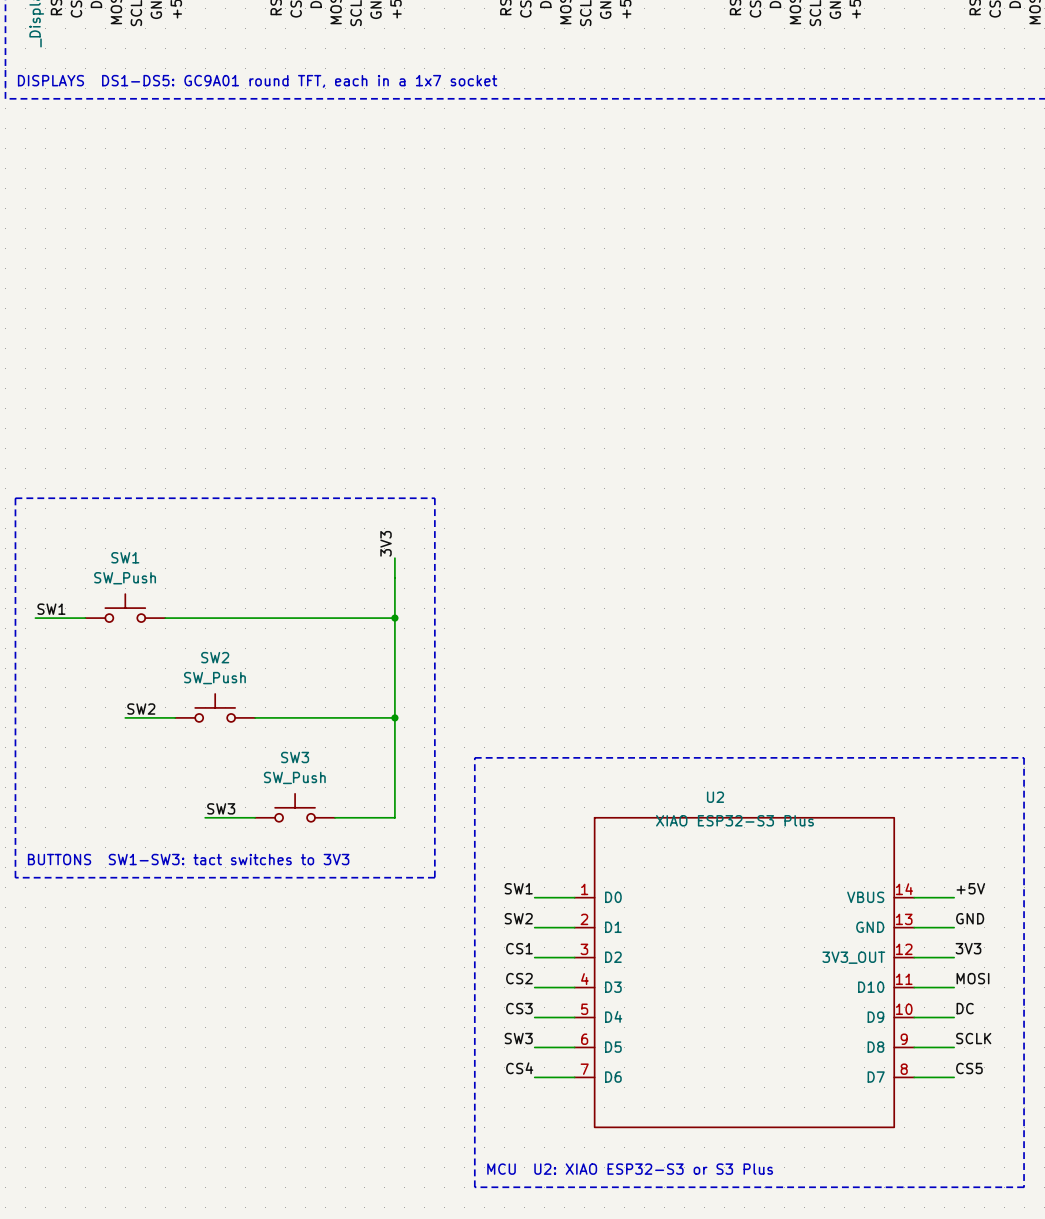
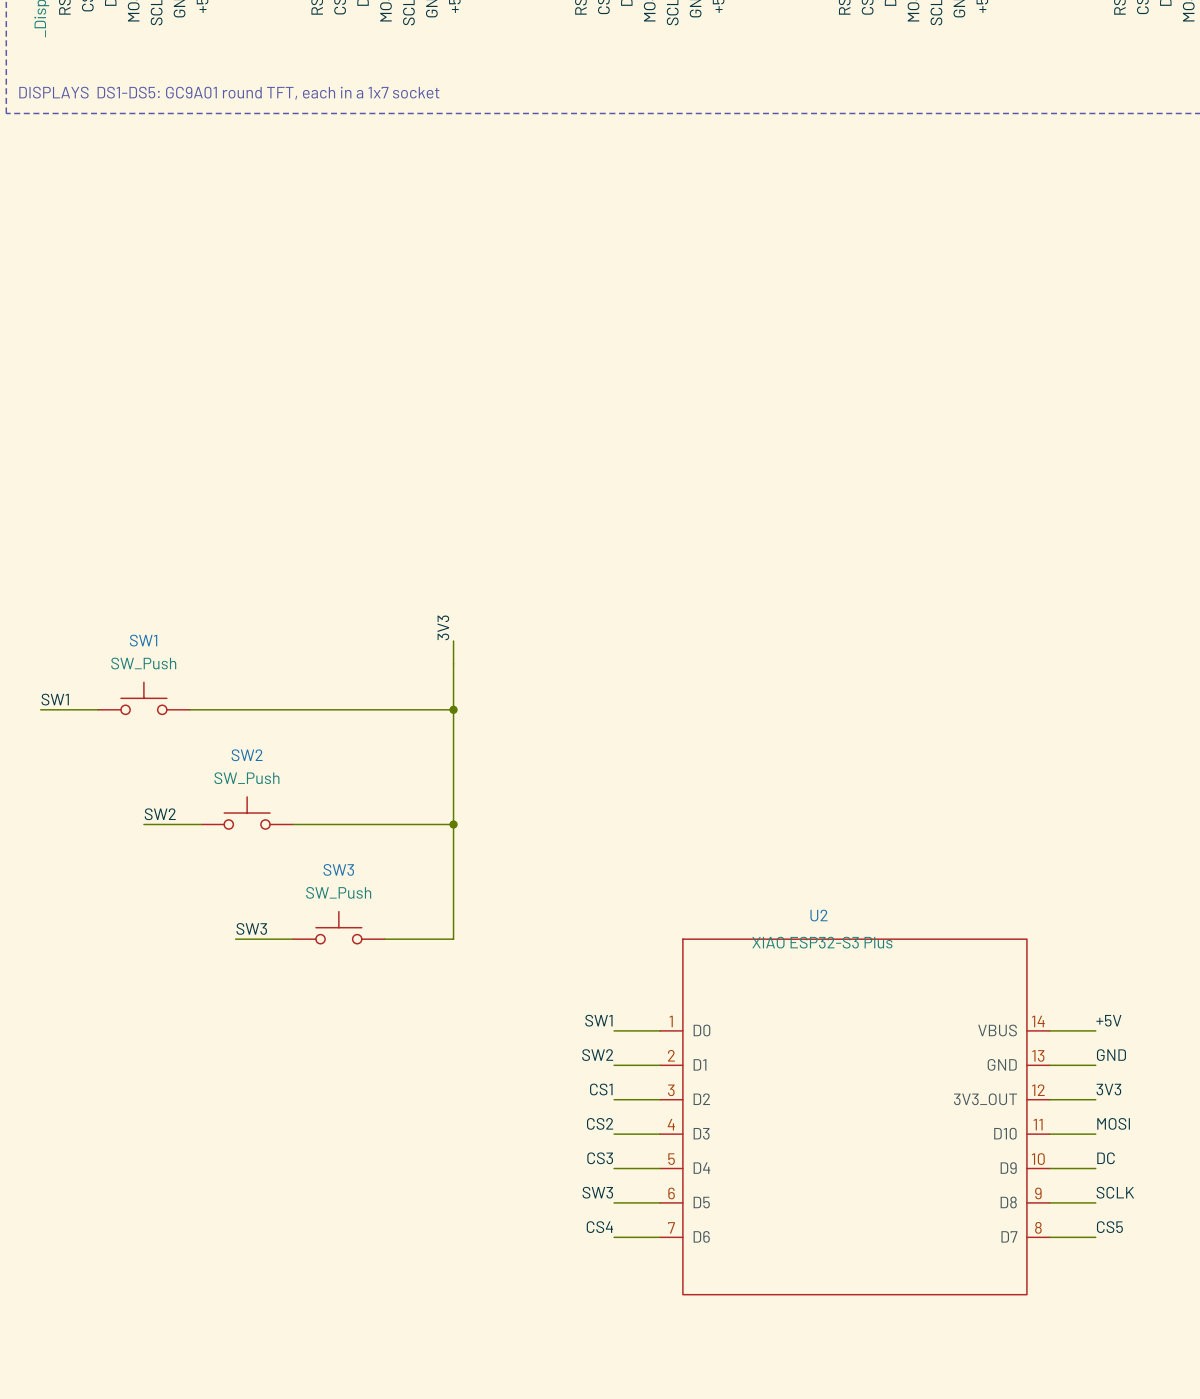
line: (15, 498) (434, 498) (434, 877) (15, 877) (15, 498) -> none
line: (474, 757) (1024, 757) (1024, 1187) (474, 1187) (474, 757) -> none
text: BUTTONS SW1-SW3: tact switches to 3V3 (188, 859) -> none
text: MCU U2: XIAO ESP32-S3 or S3 Plus (630, 1169) -> none

